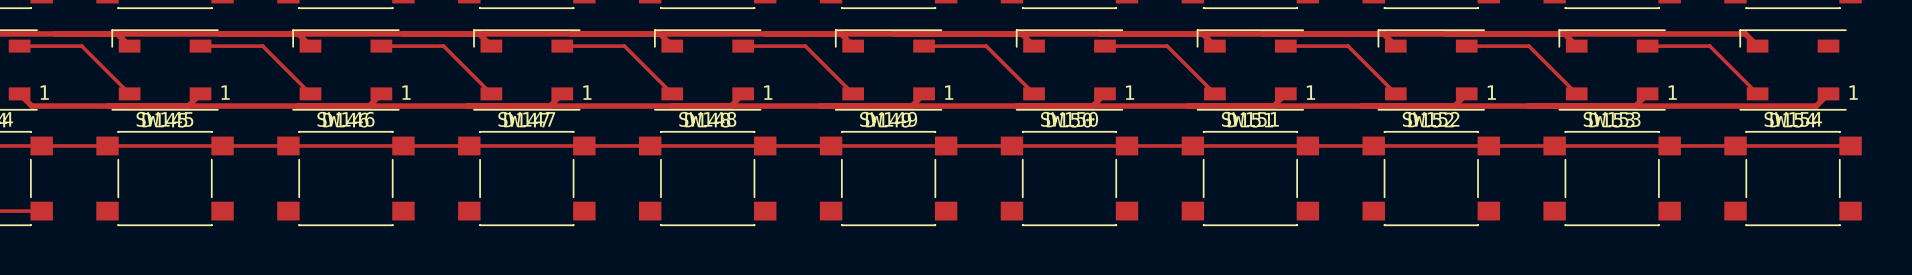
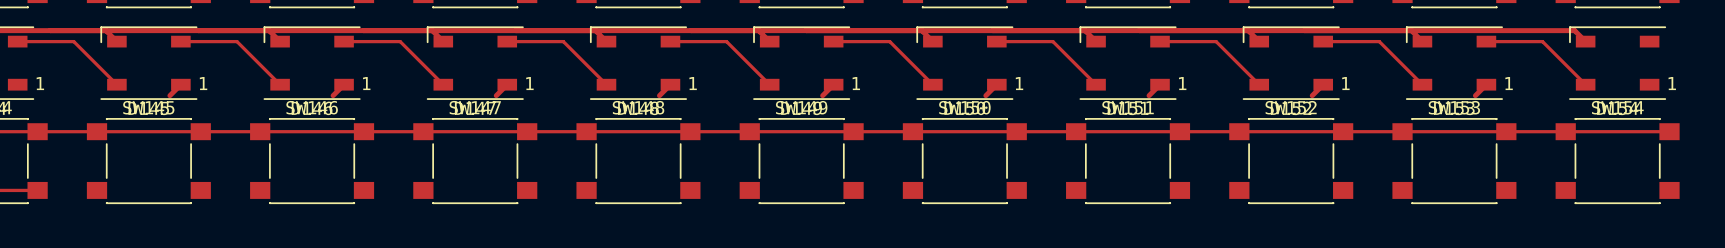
top track: (19, 93) (31, 106) (1816, 106) (1828, 93) -> none

